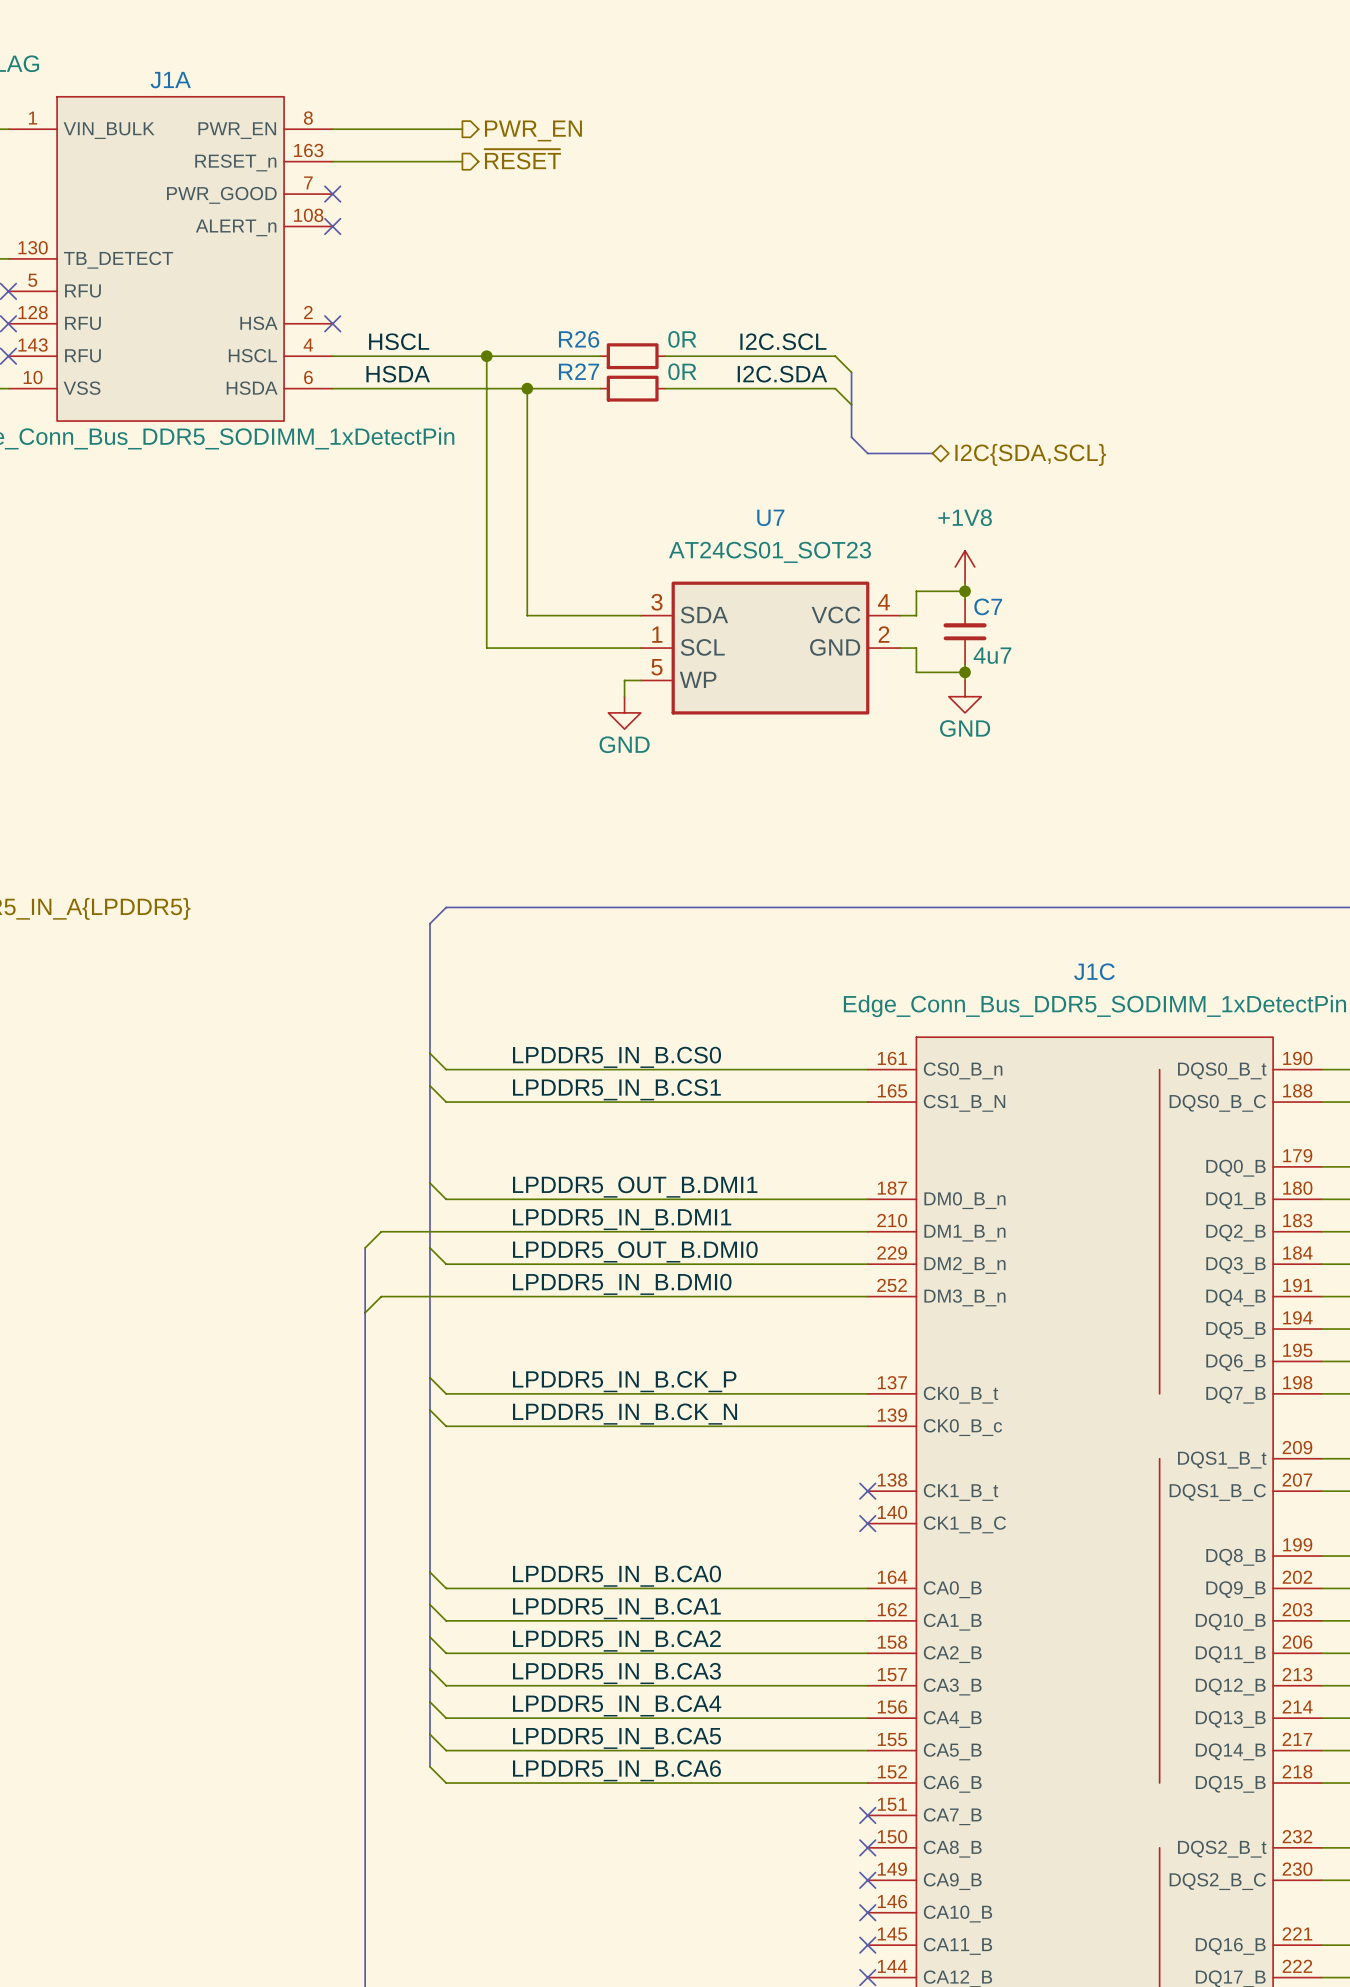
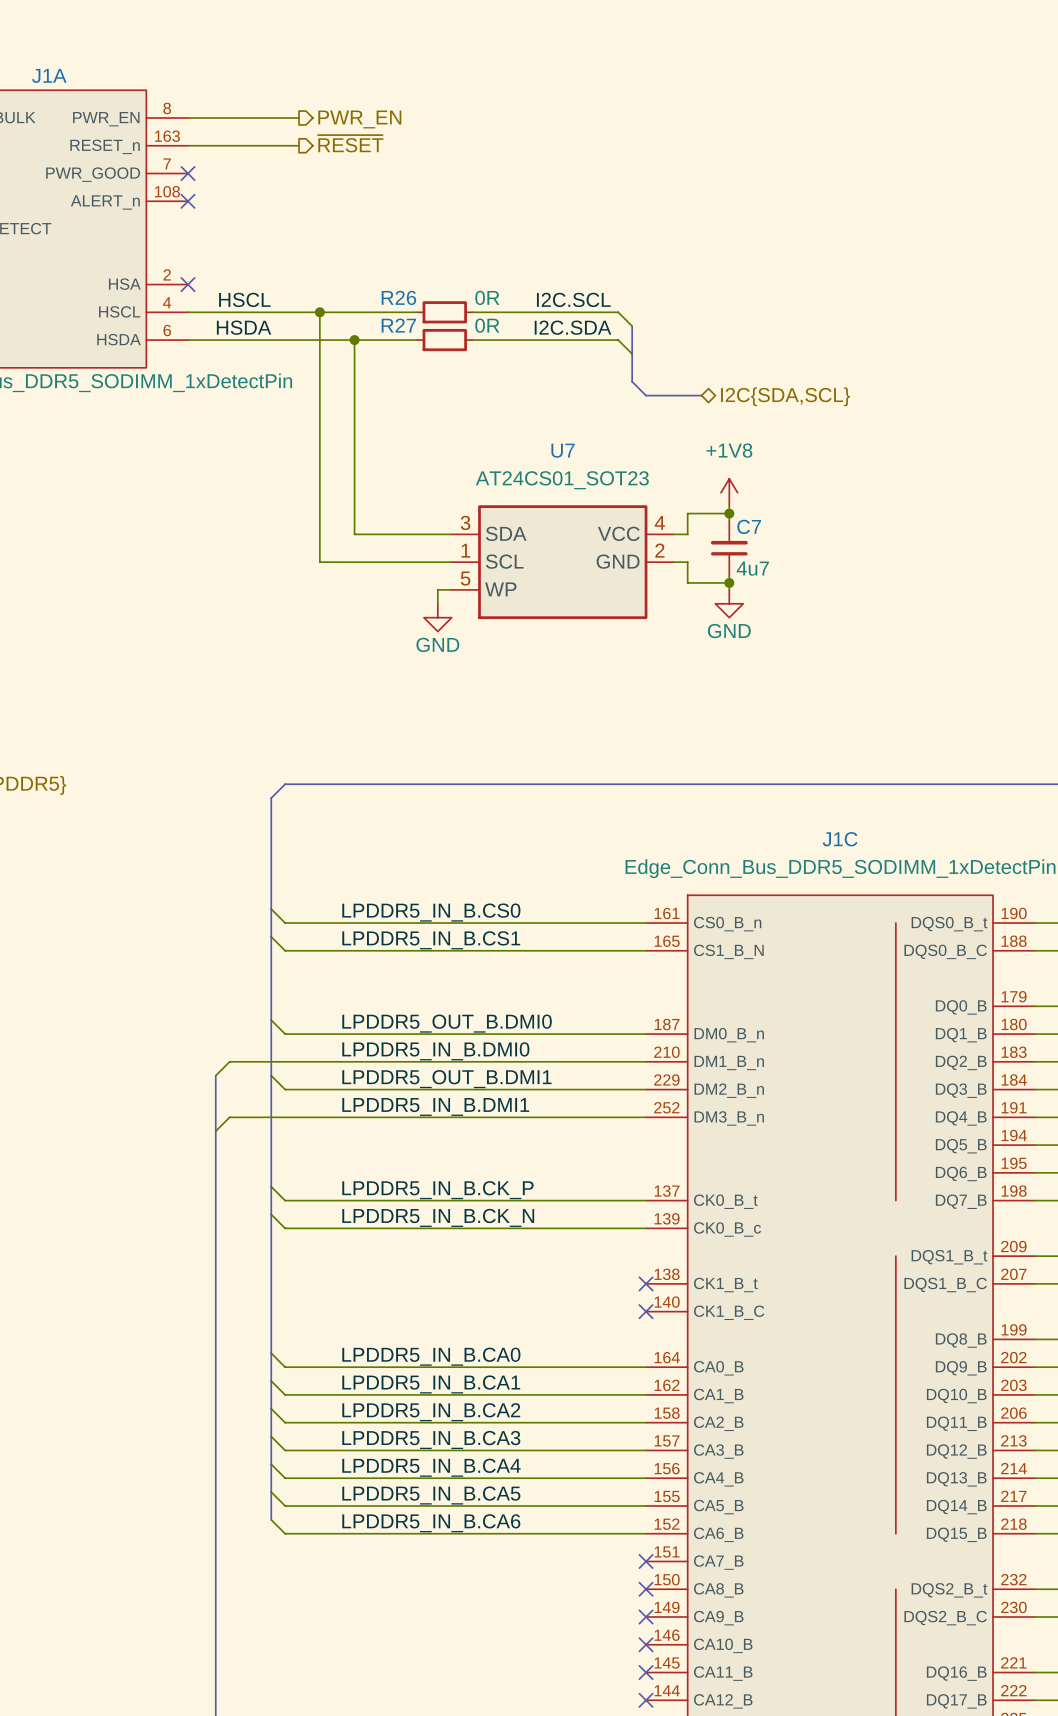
label: LPDDR5_OUT_B.DMI1 (635, 1187) -> LPDDR5_OUT_B.DMI0 (447, 1023)
label: LPDDR5_IN_B.DMI1 (622, 1219) -> LPDDR5_IN_B.DMI0 (435, 1051)
label: LPDDR5_OUT_B.DMI0 (635, 1251) -> LPDDR5_OUT_B.DMI1 (446, 1079)
label: LPDDR5_IN_B.DMI0 (622, 1284) -> LPDDR5_IN_B.DMI1 (435, 1106)

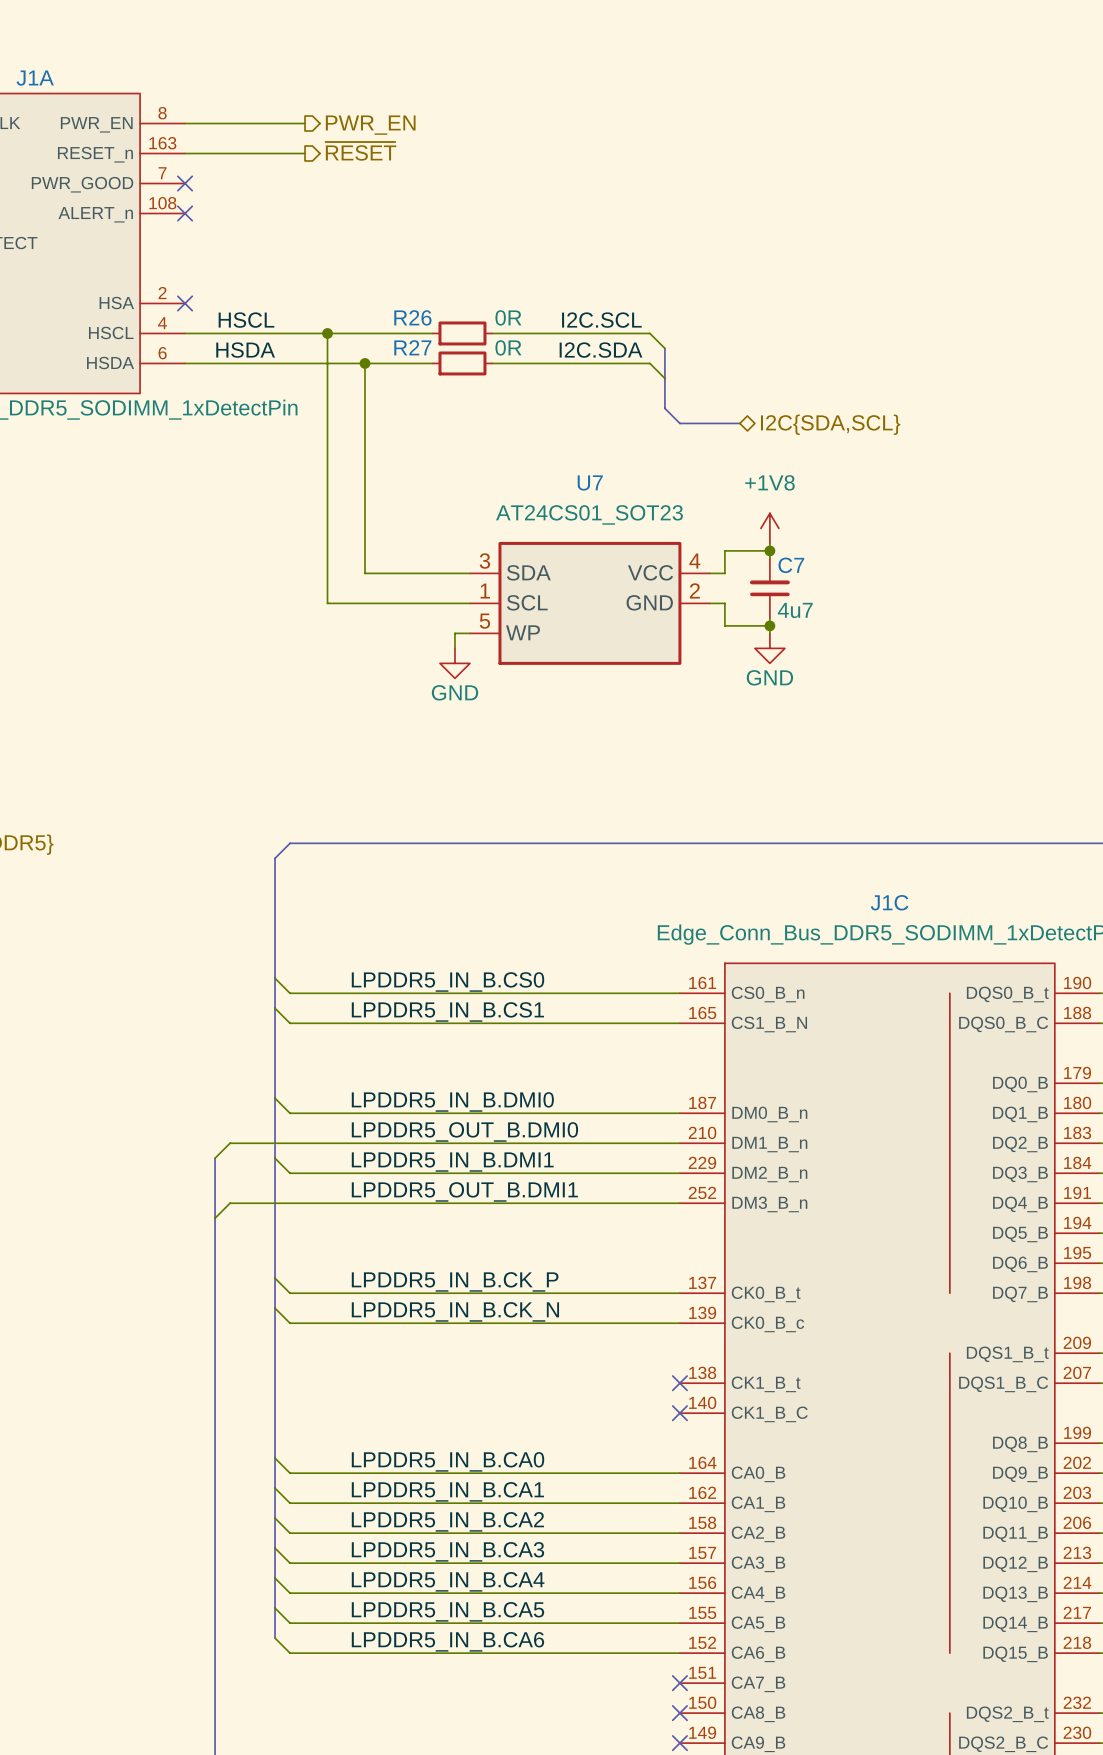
label: LPDDR5_OUT_B.DMI0 (447, 1023) -> LPDDR5_IN_B.DMI0 (452, 1101)
label: LPDDR5_IN_B.DMI0 (435, 1051) -> LPDDR5_OUT_B.DMI0 (464, 1131)
label: LPDDR5_OUT_B.DMI1 (446, 1079) -> LPDDR5_IN_B.DMI1 (452, 1162)
label: LPDDR5_IN_B.DMI1 (435, 1106) -> LPDDR5_OUT_B.DMI1 (464, 1191)

